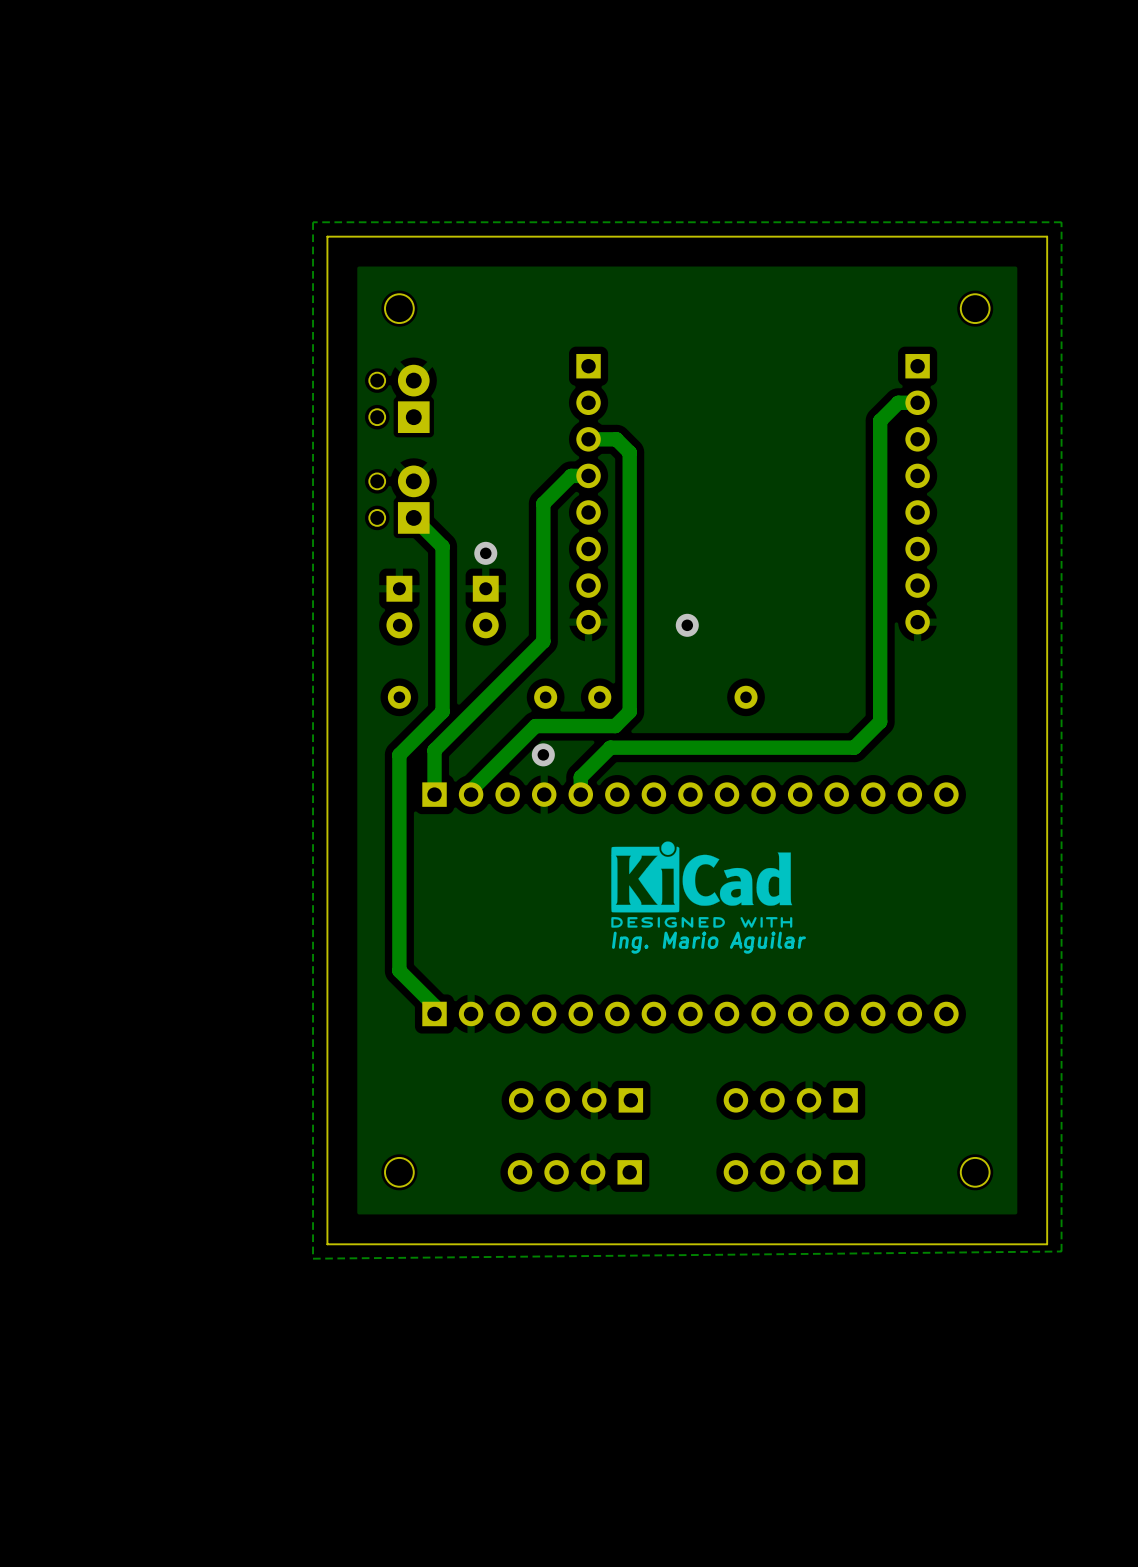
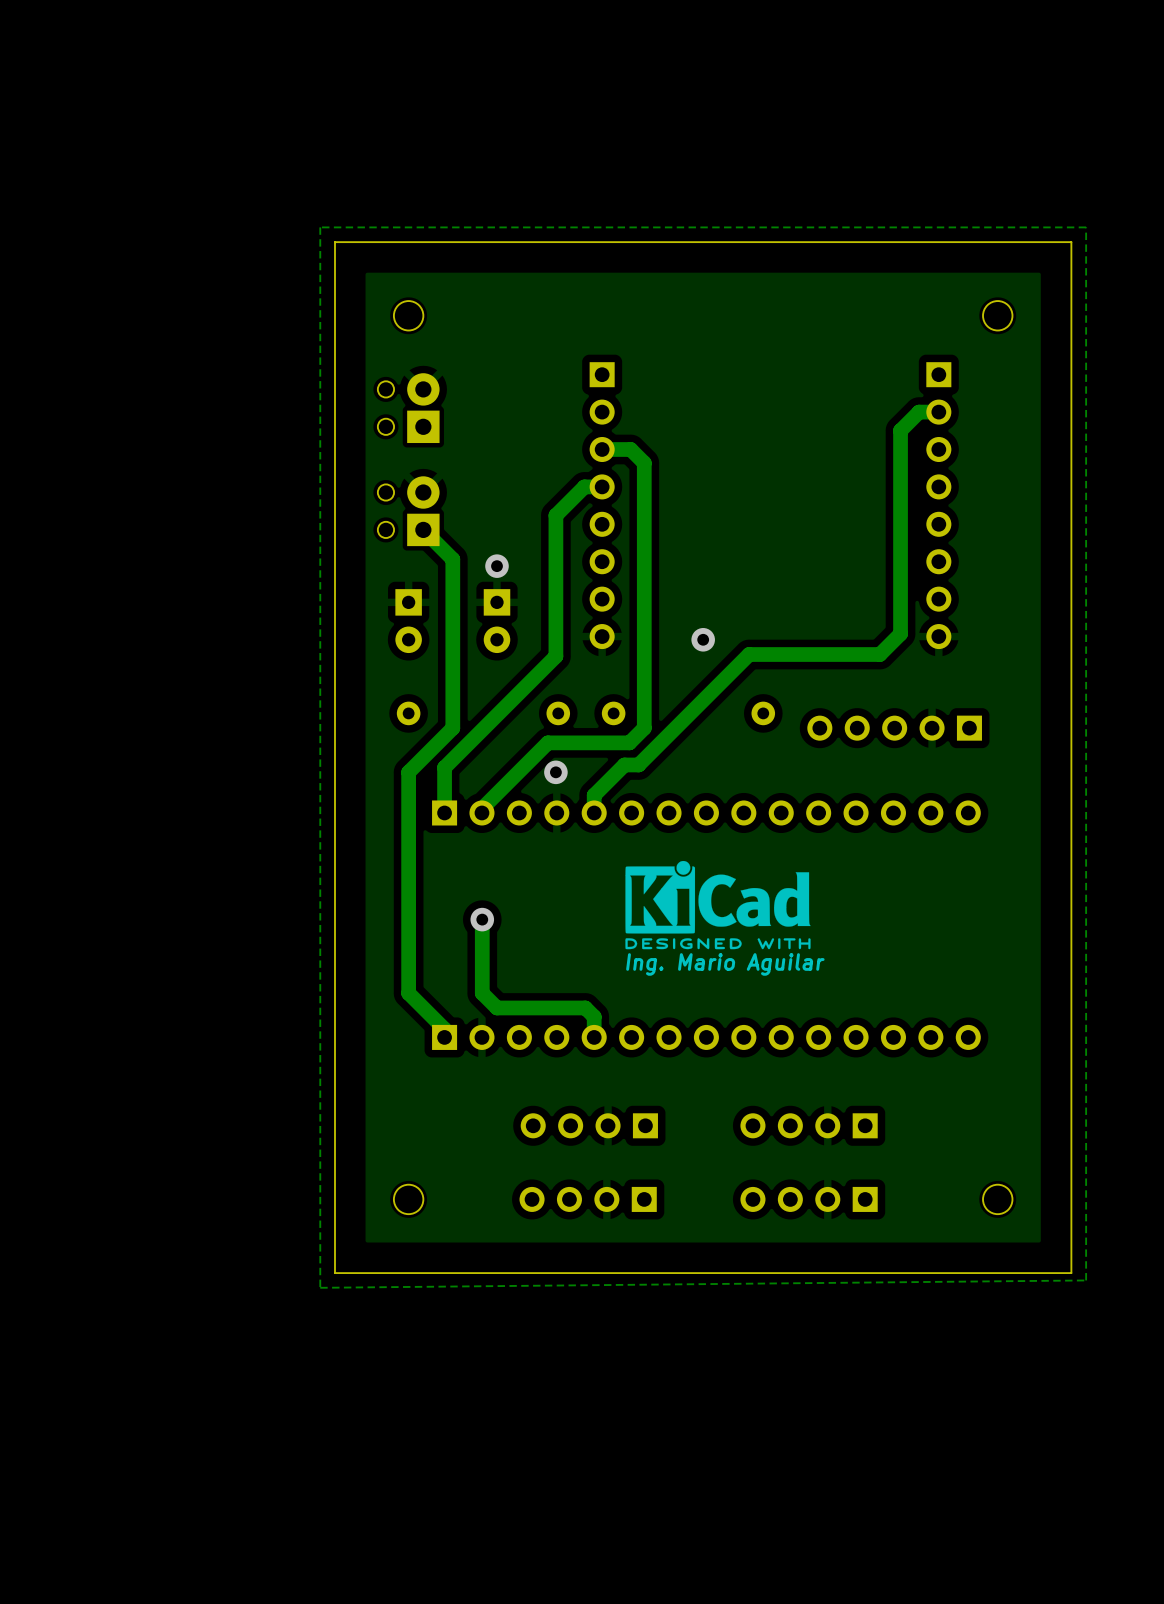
track: (880, 619) (880, 721) (854, 747) (624, 747) -> (900, 633) (879, 654) (749, 654) (638, 764)
part: none -> (894, 728)
track: none -> (482, 919) (482, 993) (497, 1007) (585, 1007) (594, 1016) (594, 1037)
via: none -> (482, 919)

